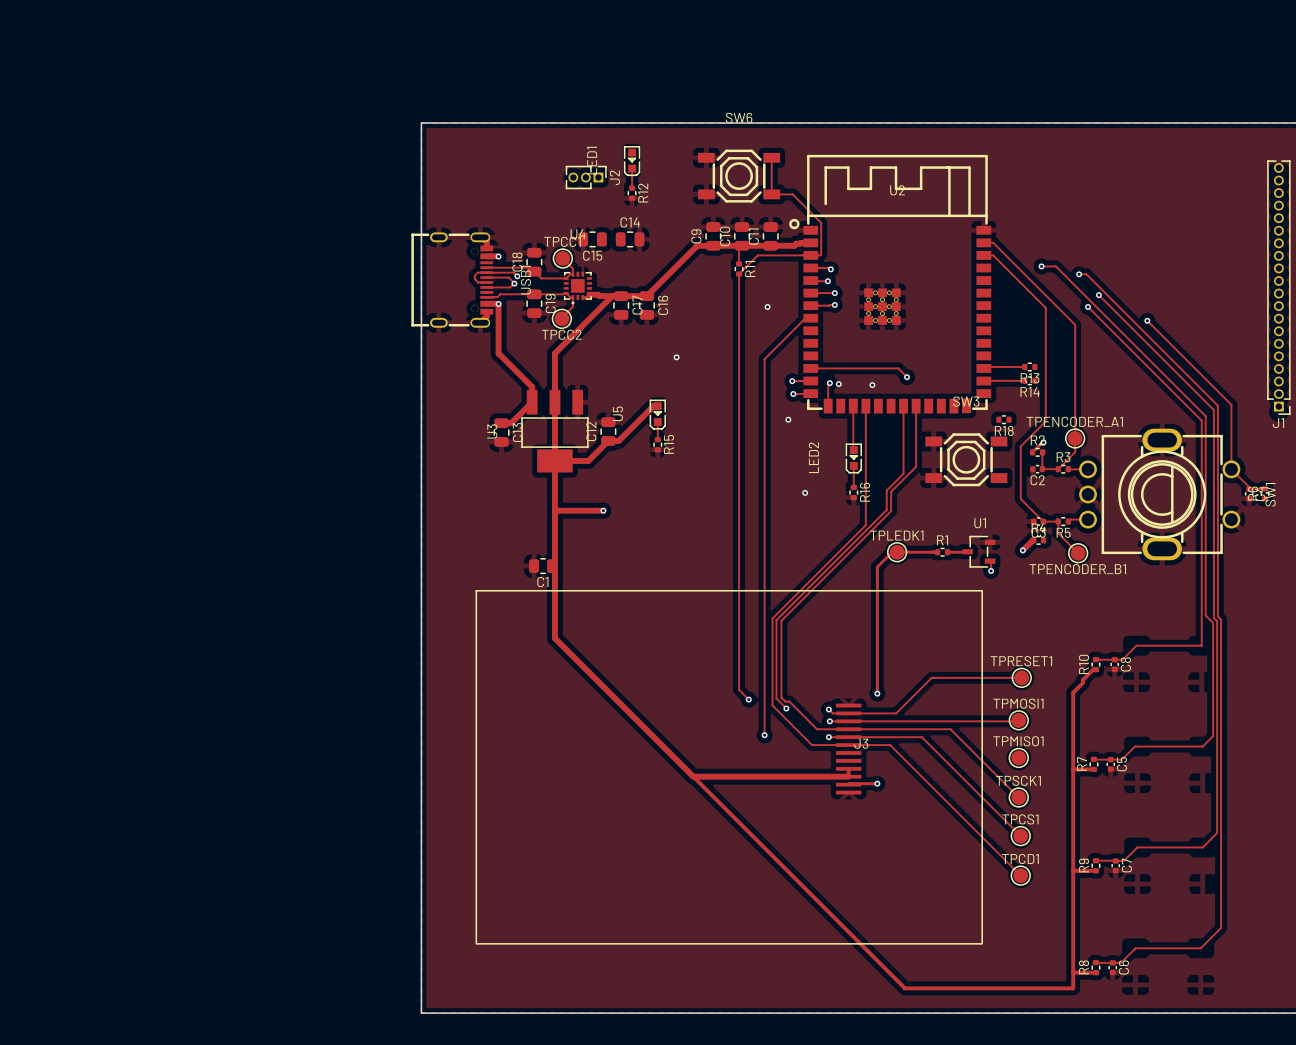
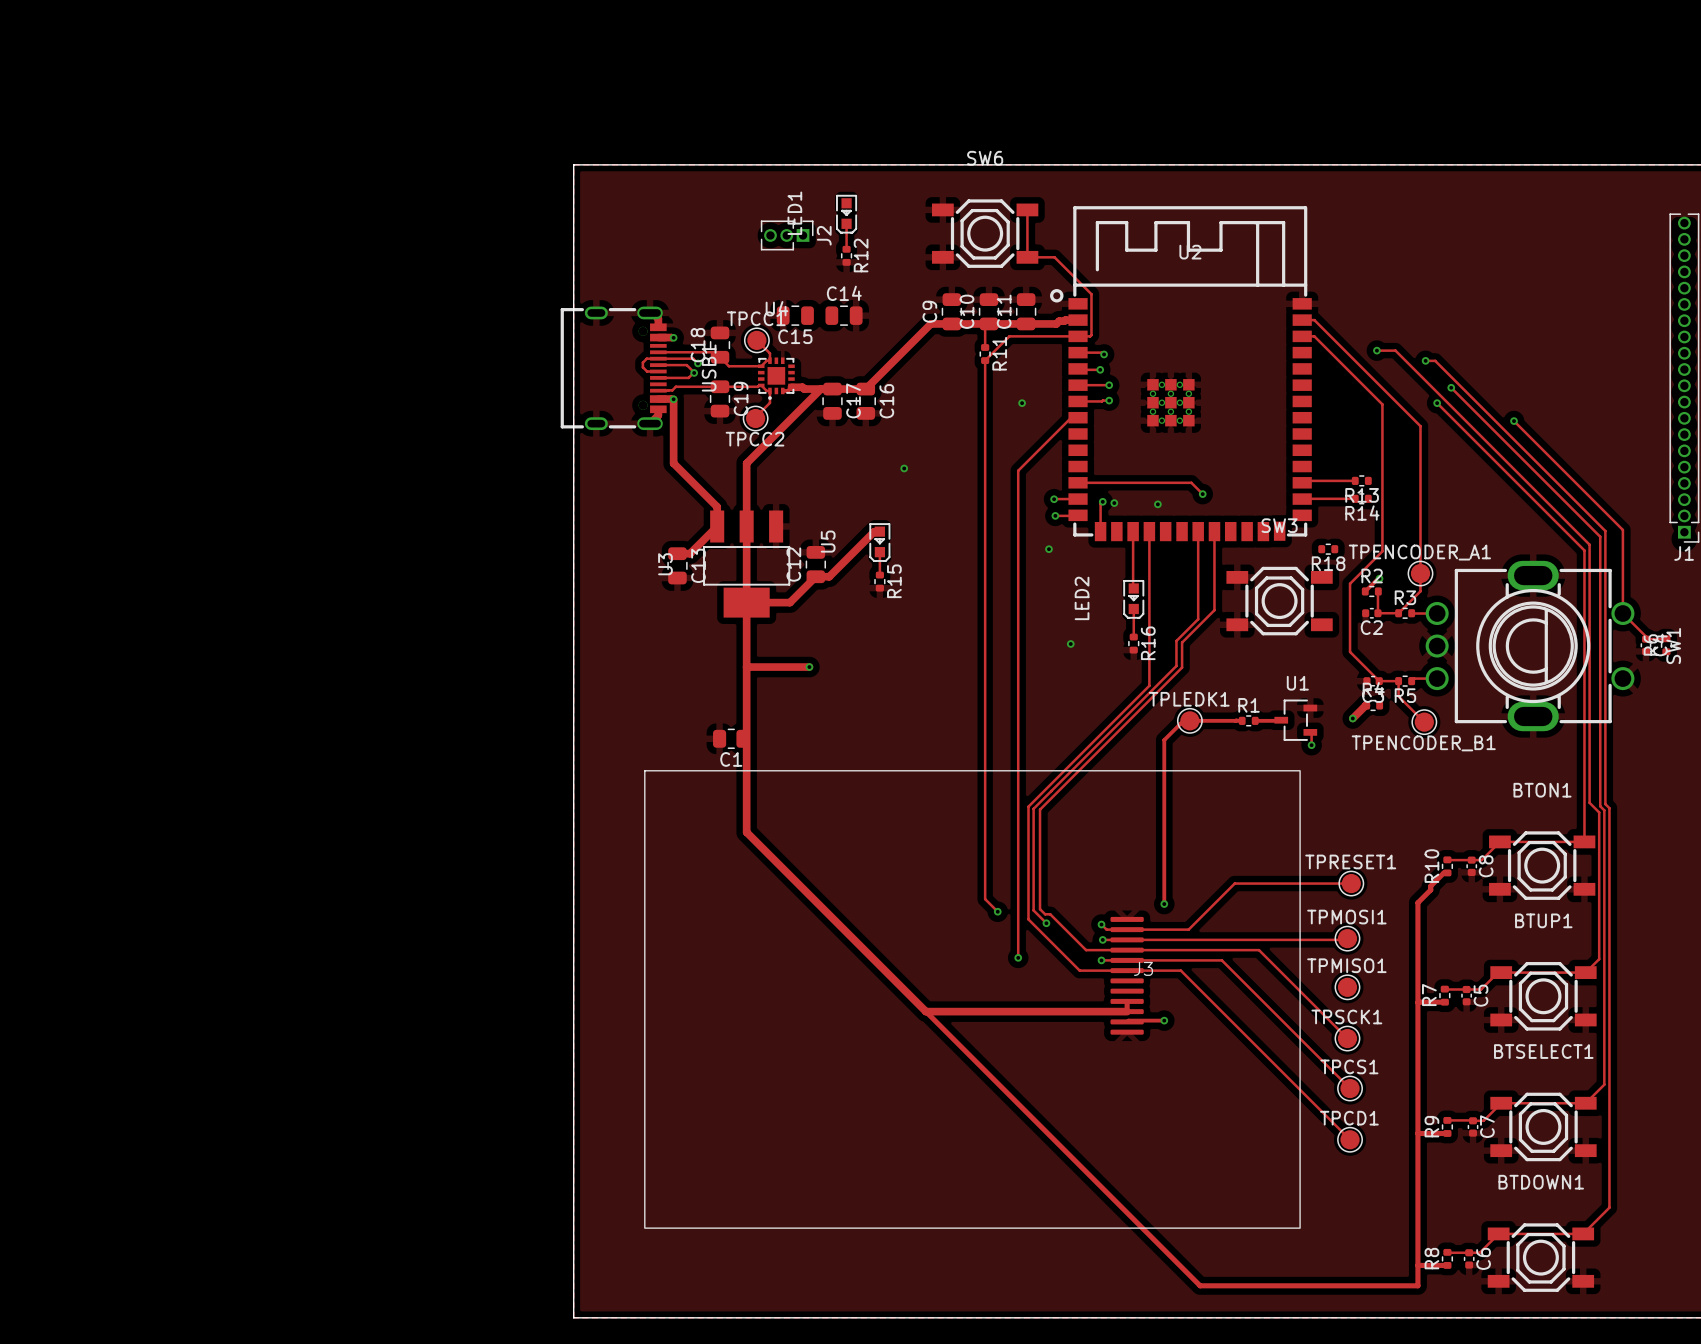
BTON1: none -> (1542, 865)
BTUP1: none -> (1543, 996)
BTSELECT1: none -> (1543, 1126)
BTDOWN1: none -> (1540, 1257)

